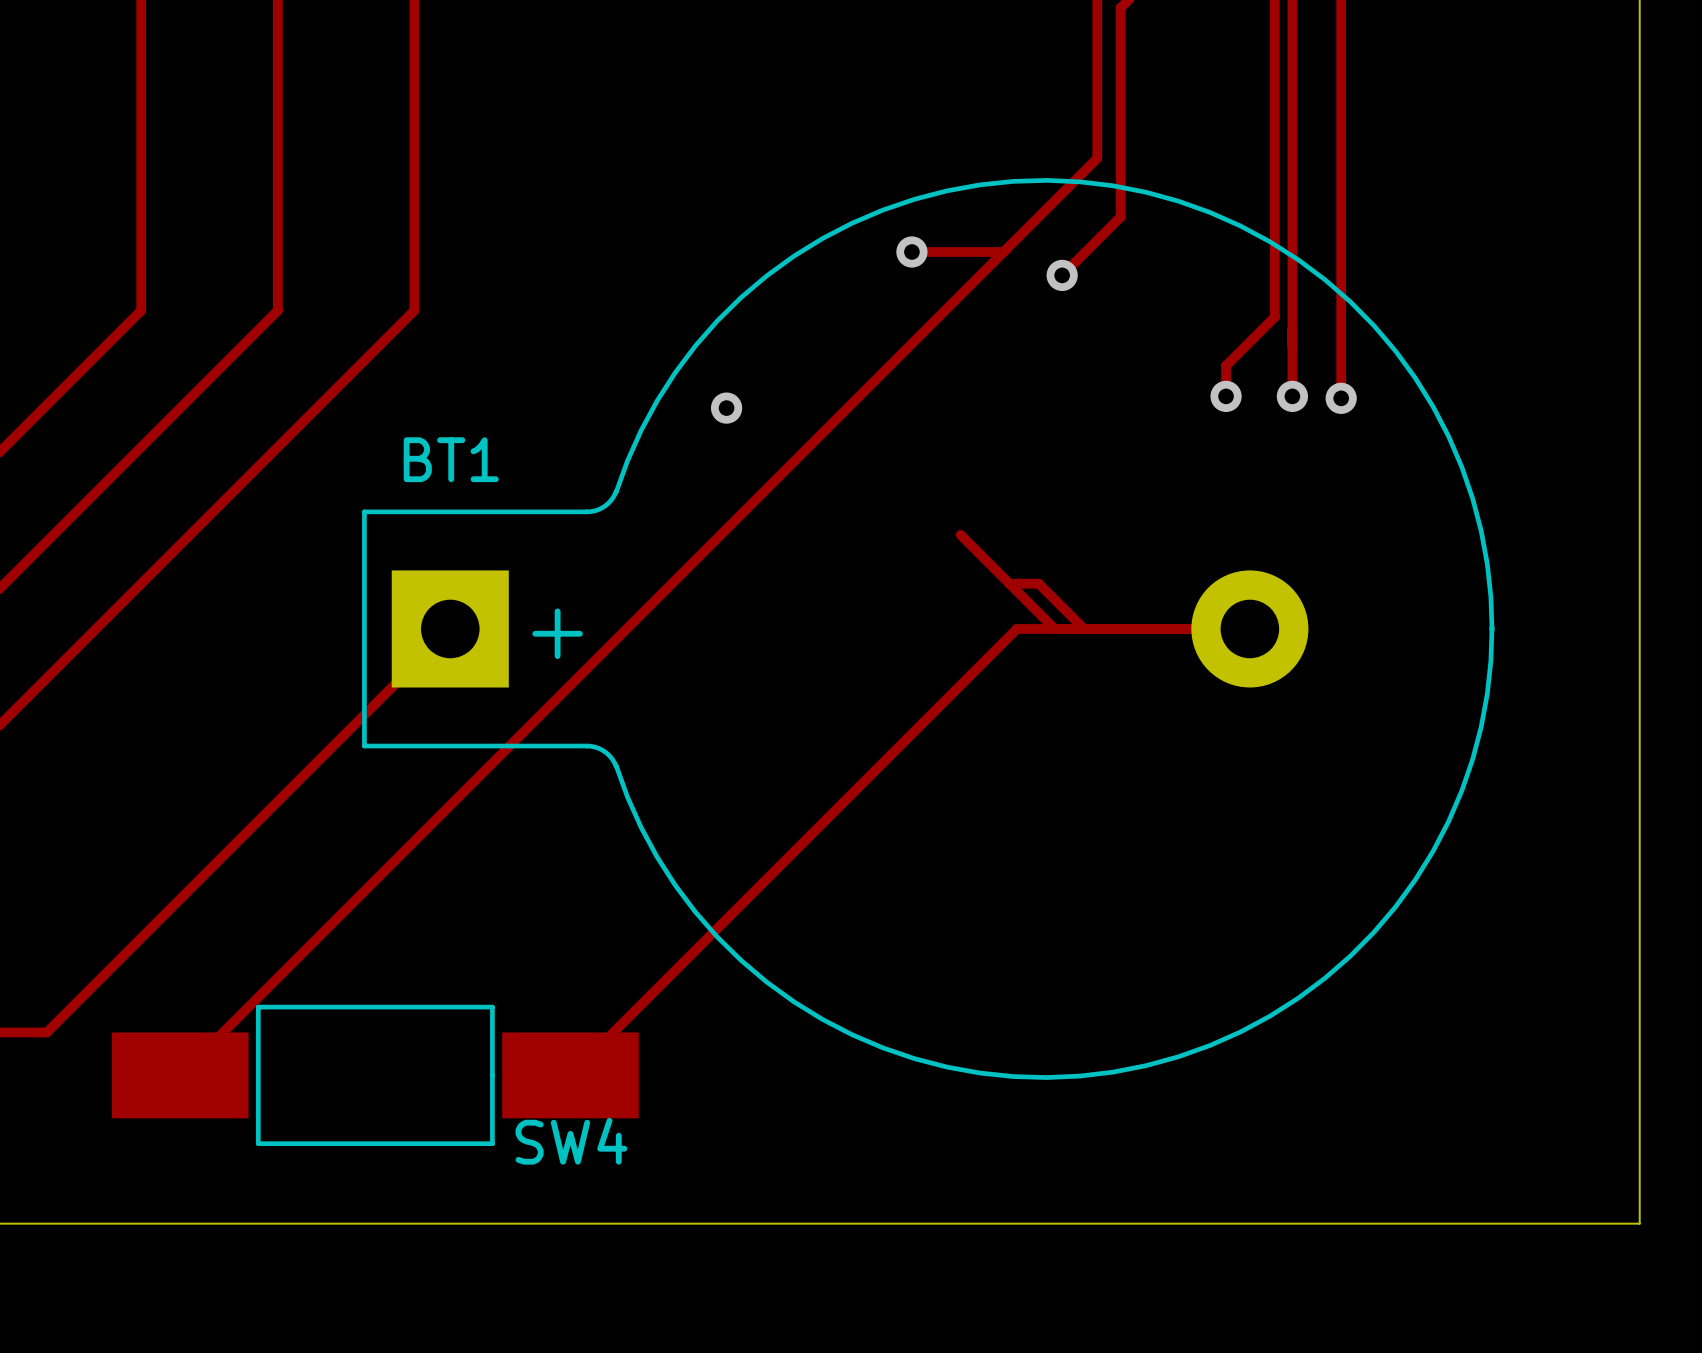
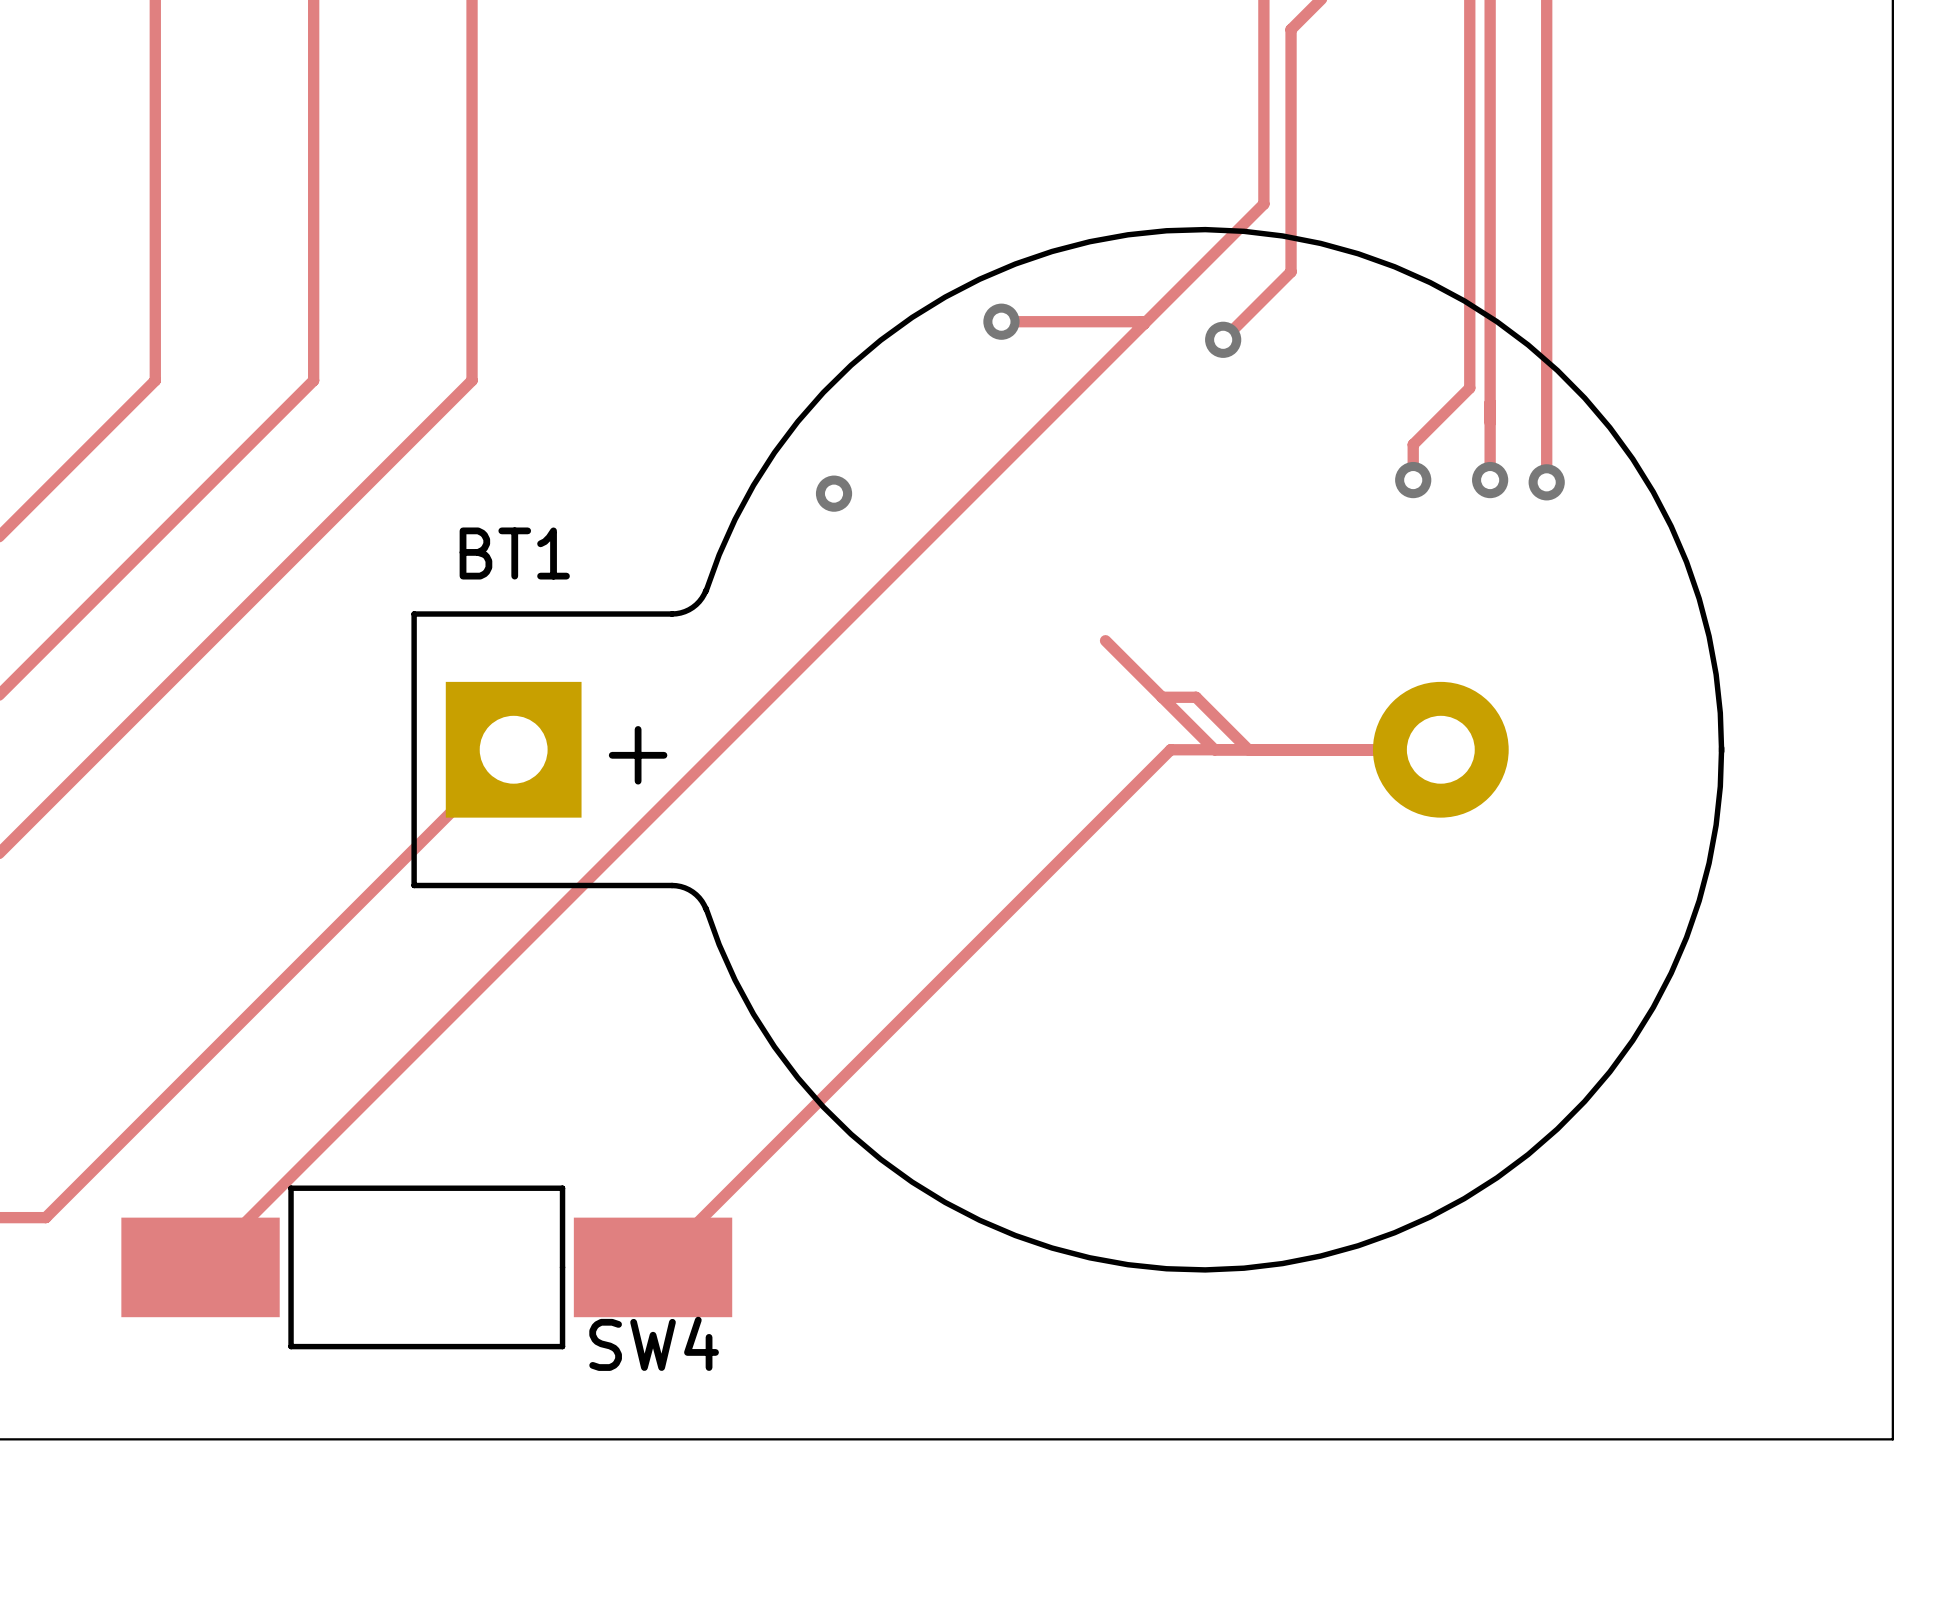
track: (911, 251) (1003, 251) -> none
via position: (911, 251) -> (1001, 321)
track: none -> (1003, 323) (1001, 321) (1141, 321) (1143, 323) (1139, 323)

